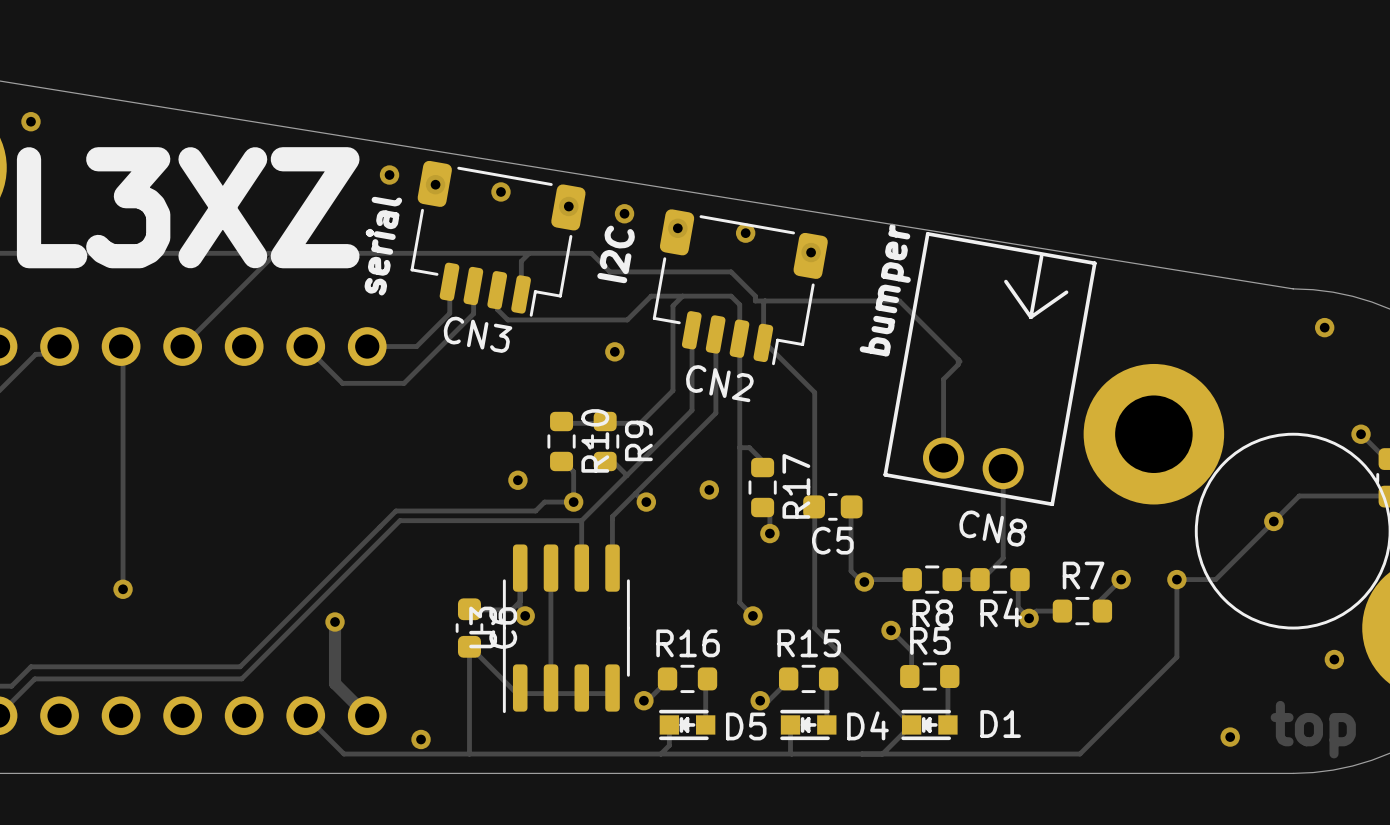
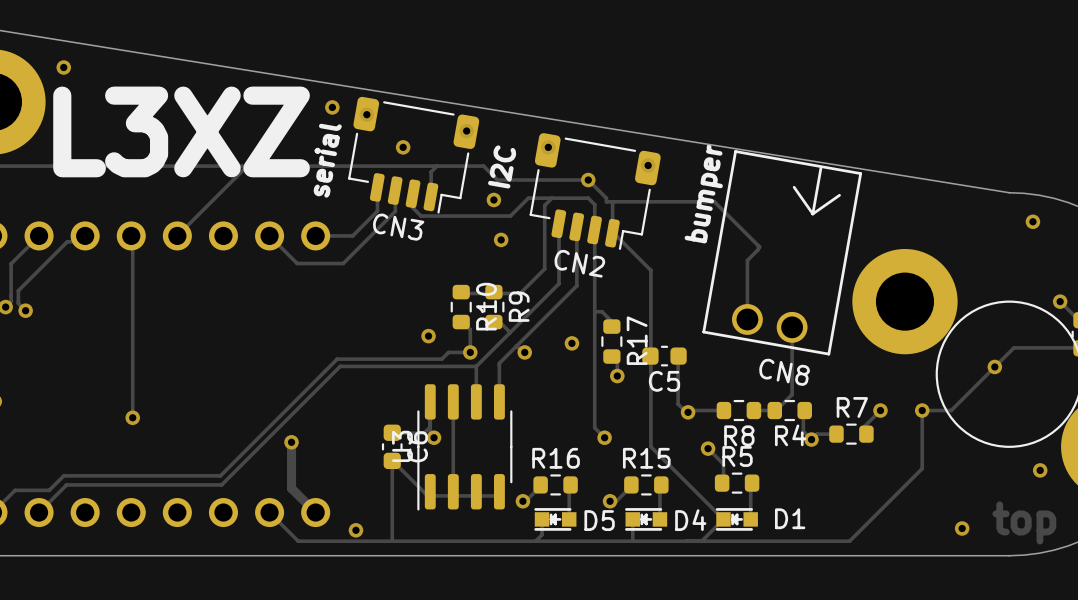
via position: (500, 191) -> (403, 147)
via: (624, 213) -> none
via position: (745, 233) -> (588, 180)
via: none -> (493, 199)

